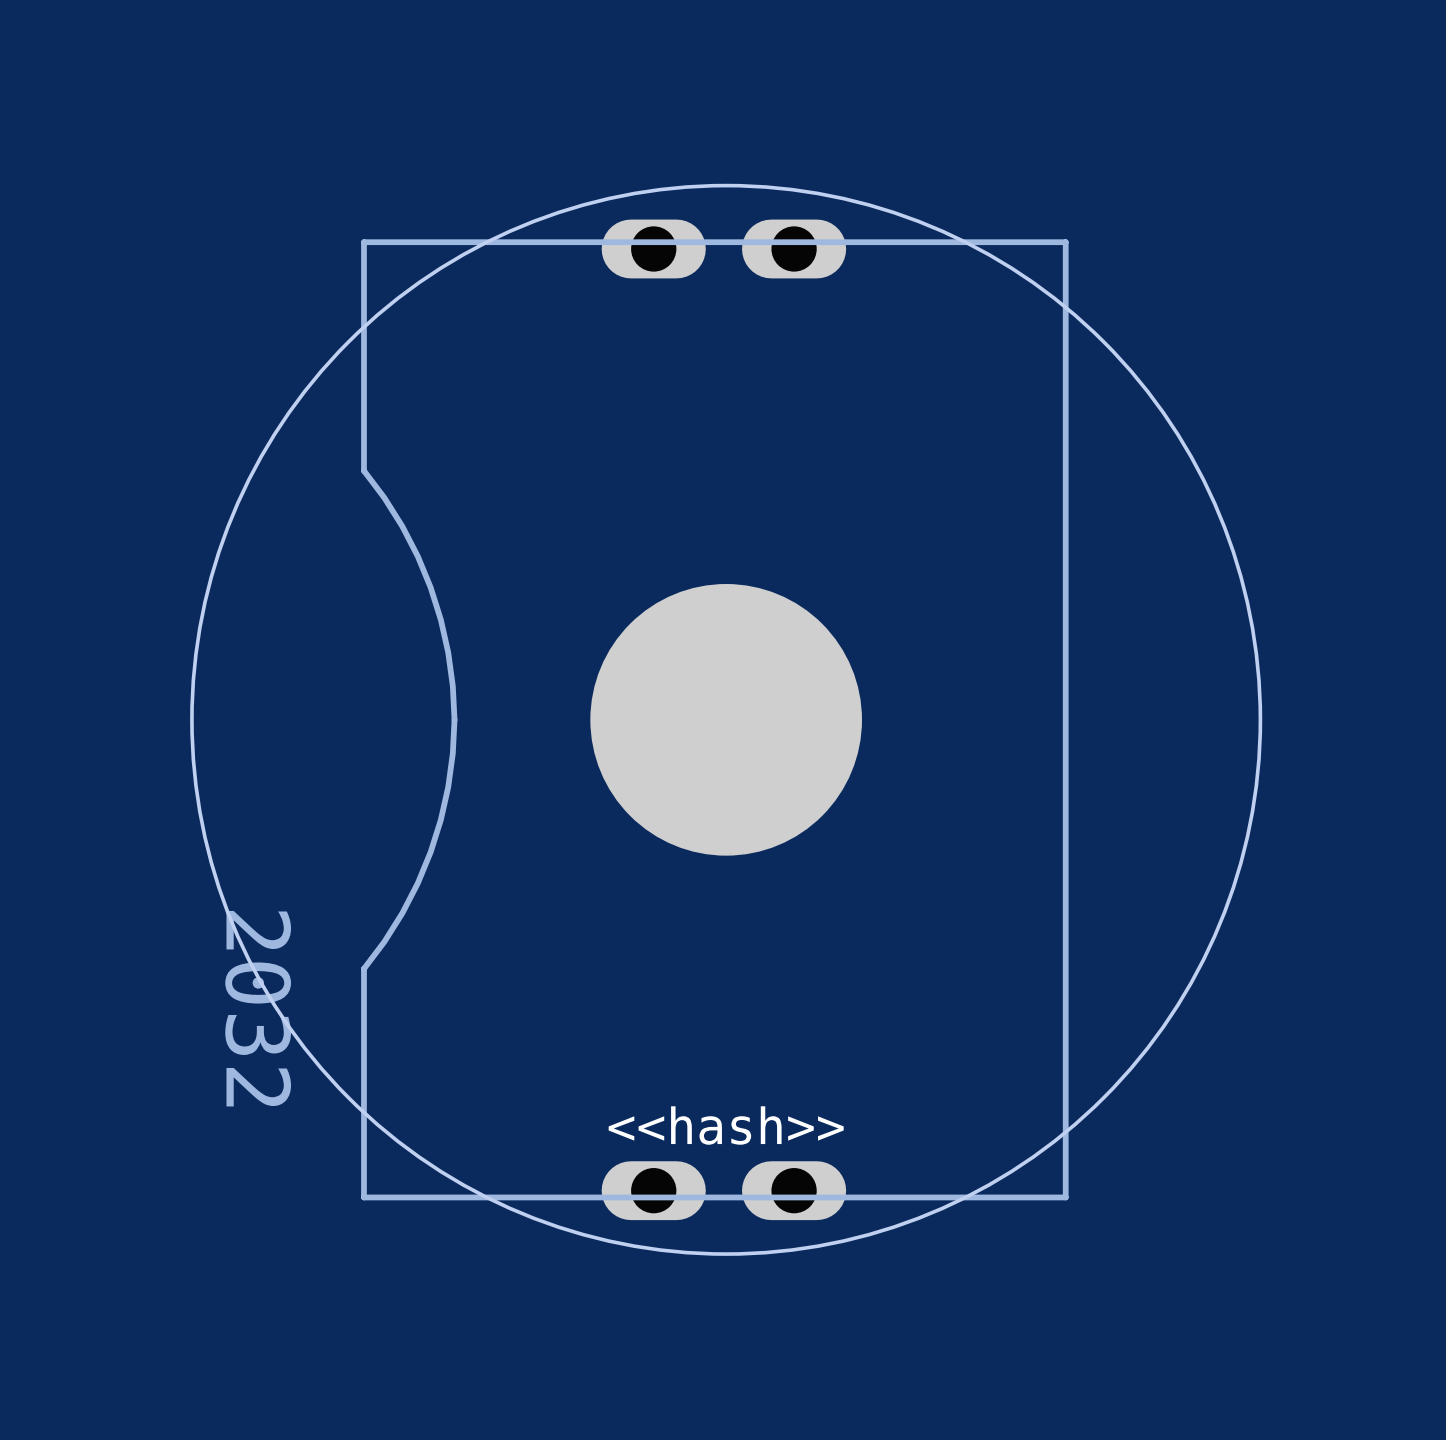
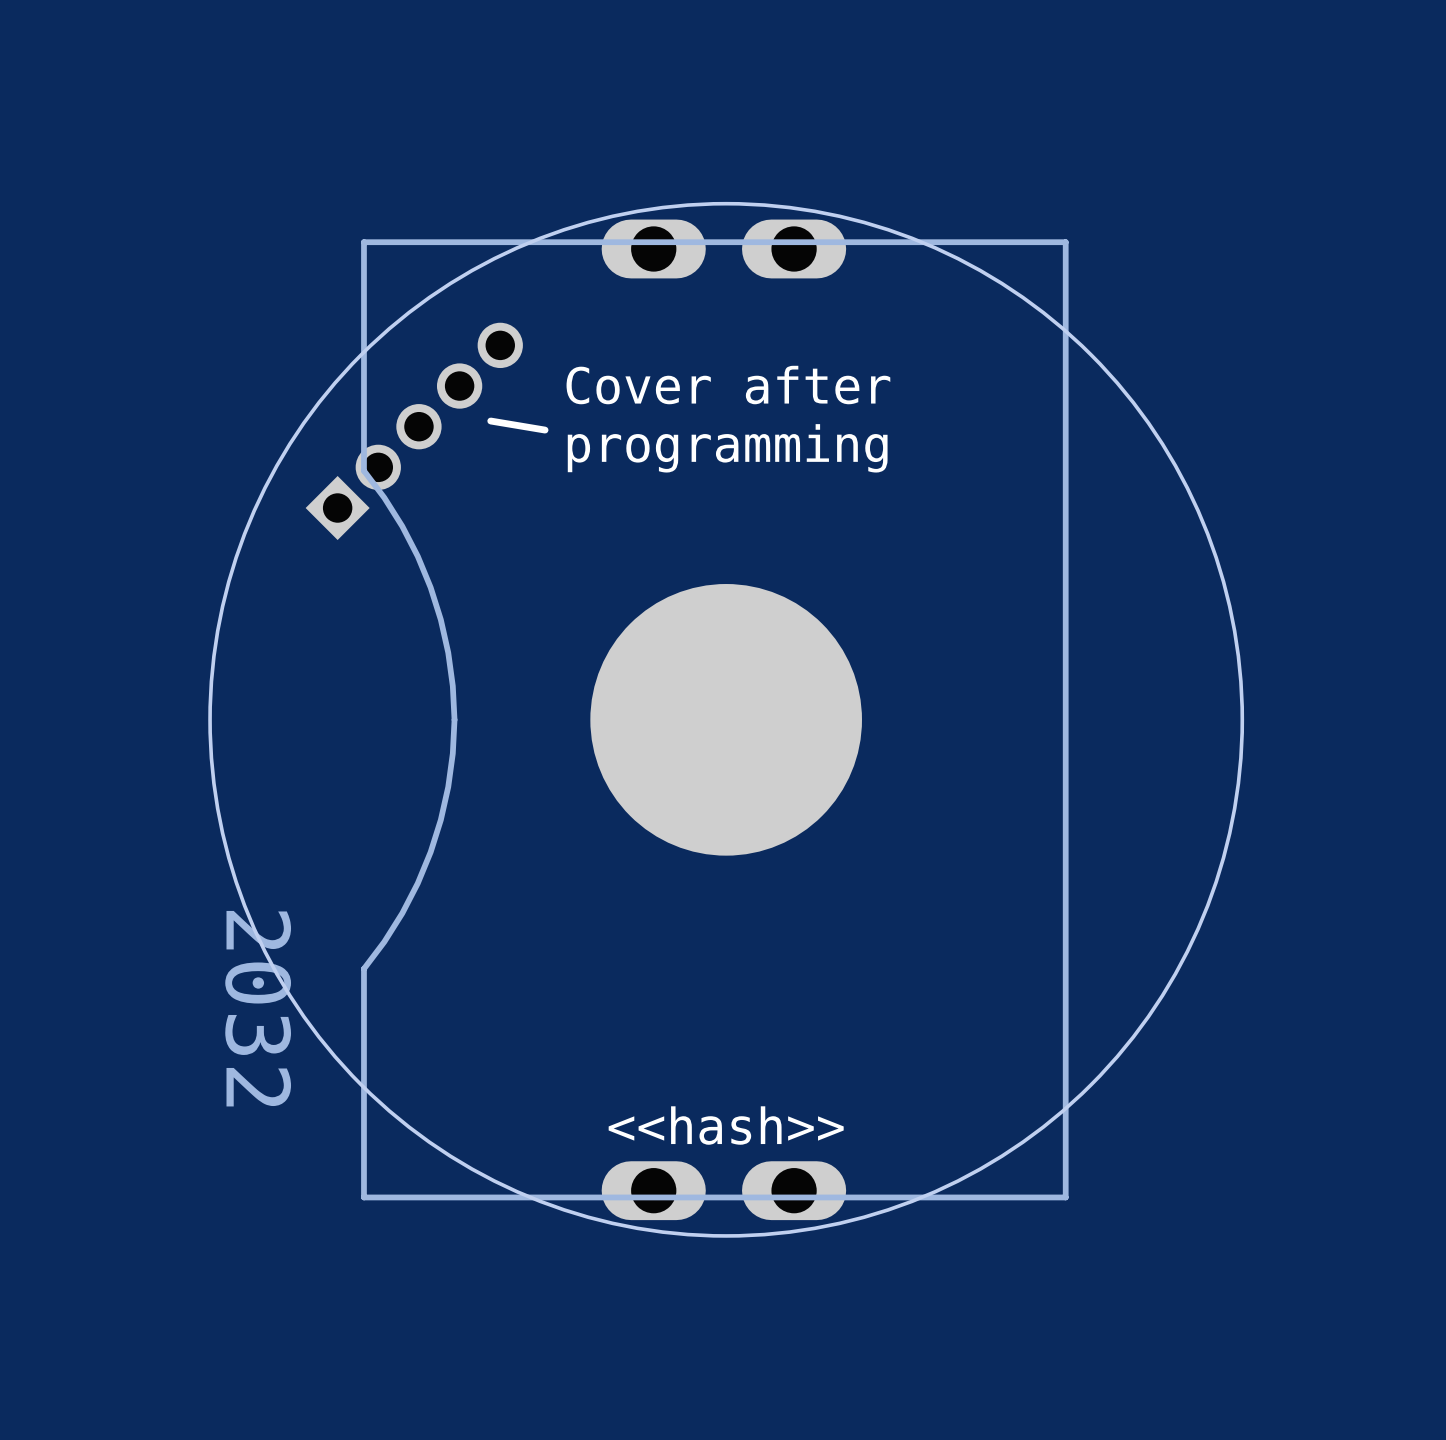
round board edge size: [190, 183, 1263, 1256] -> [208, 201, 1245, 1238]
text: none -> Cover after (728, 385)
line: none -> (490, 421) (545, 430)
part: none -> (414, 431)
text: none -> programming (727, 448)

